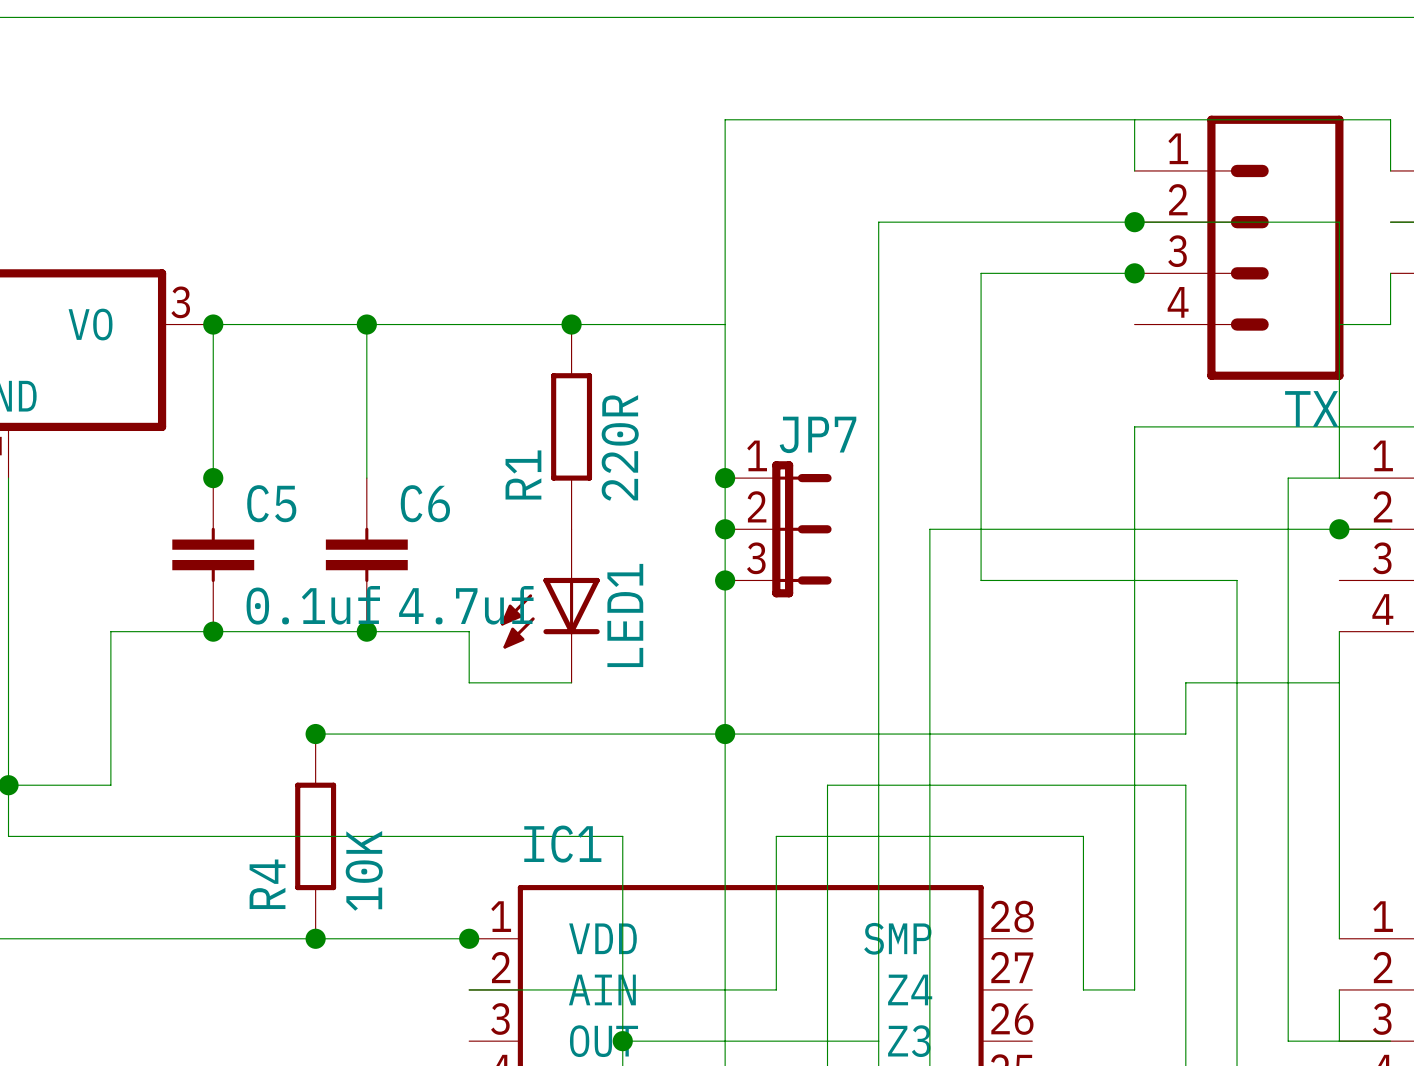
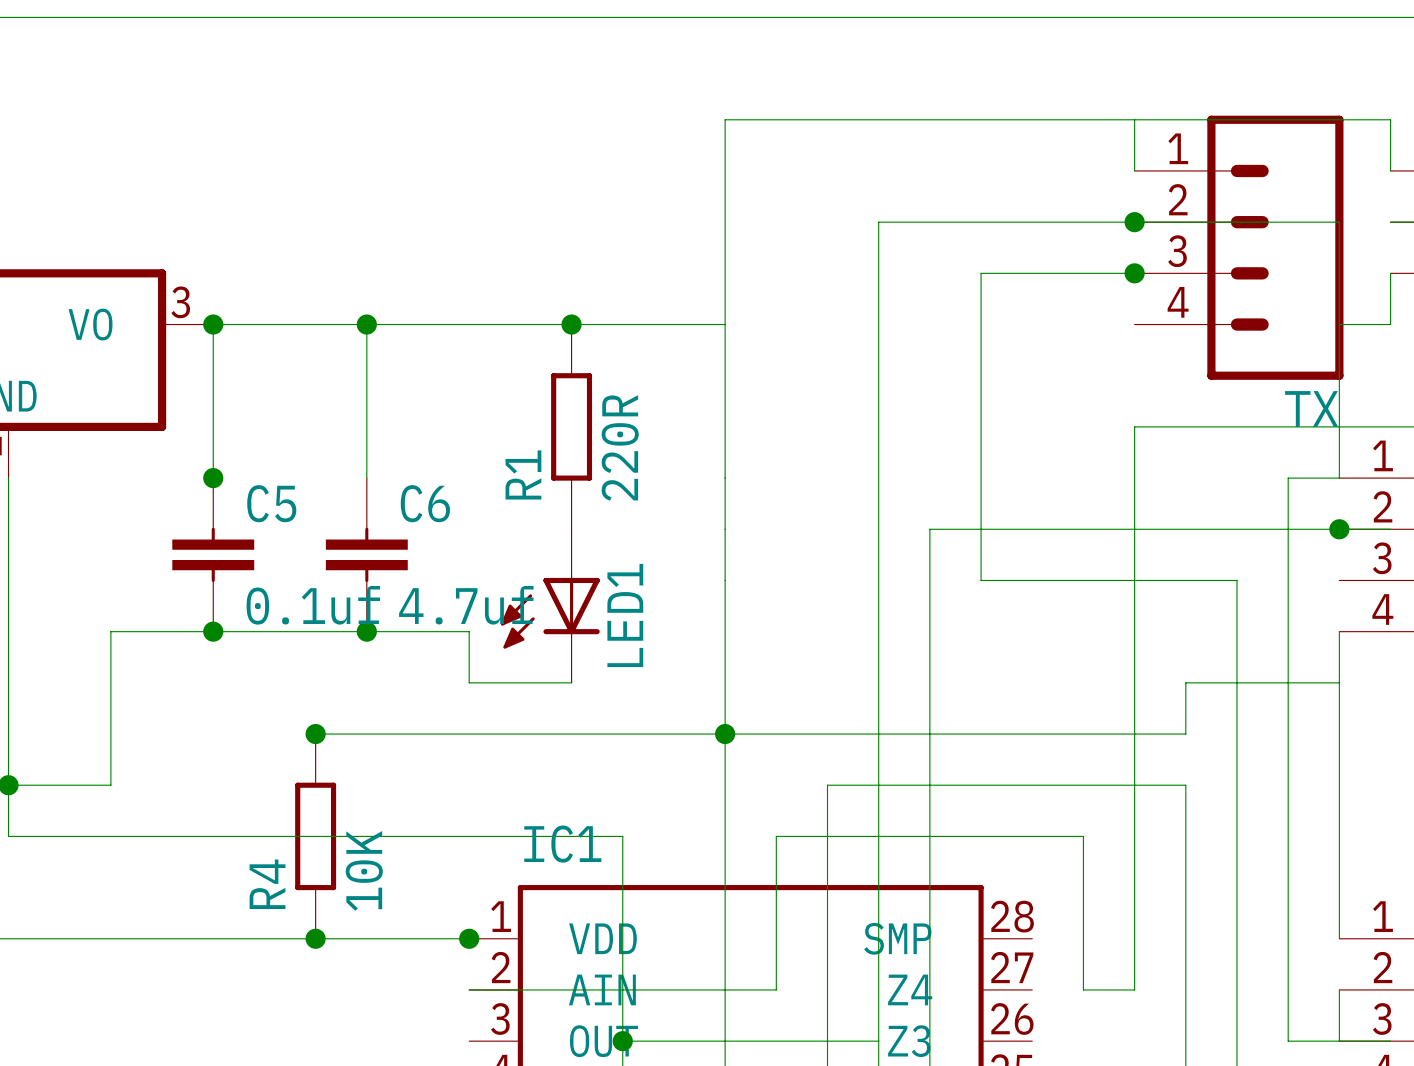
junction: (725, 478) -> none
junction: (725, 529) -> none
JP7: (778, 529) -> none
junction: (725, 580) -> none

